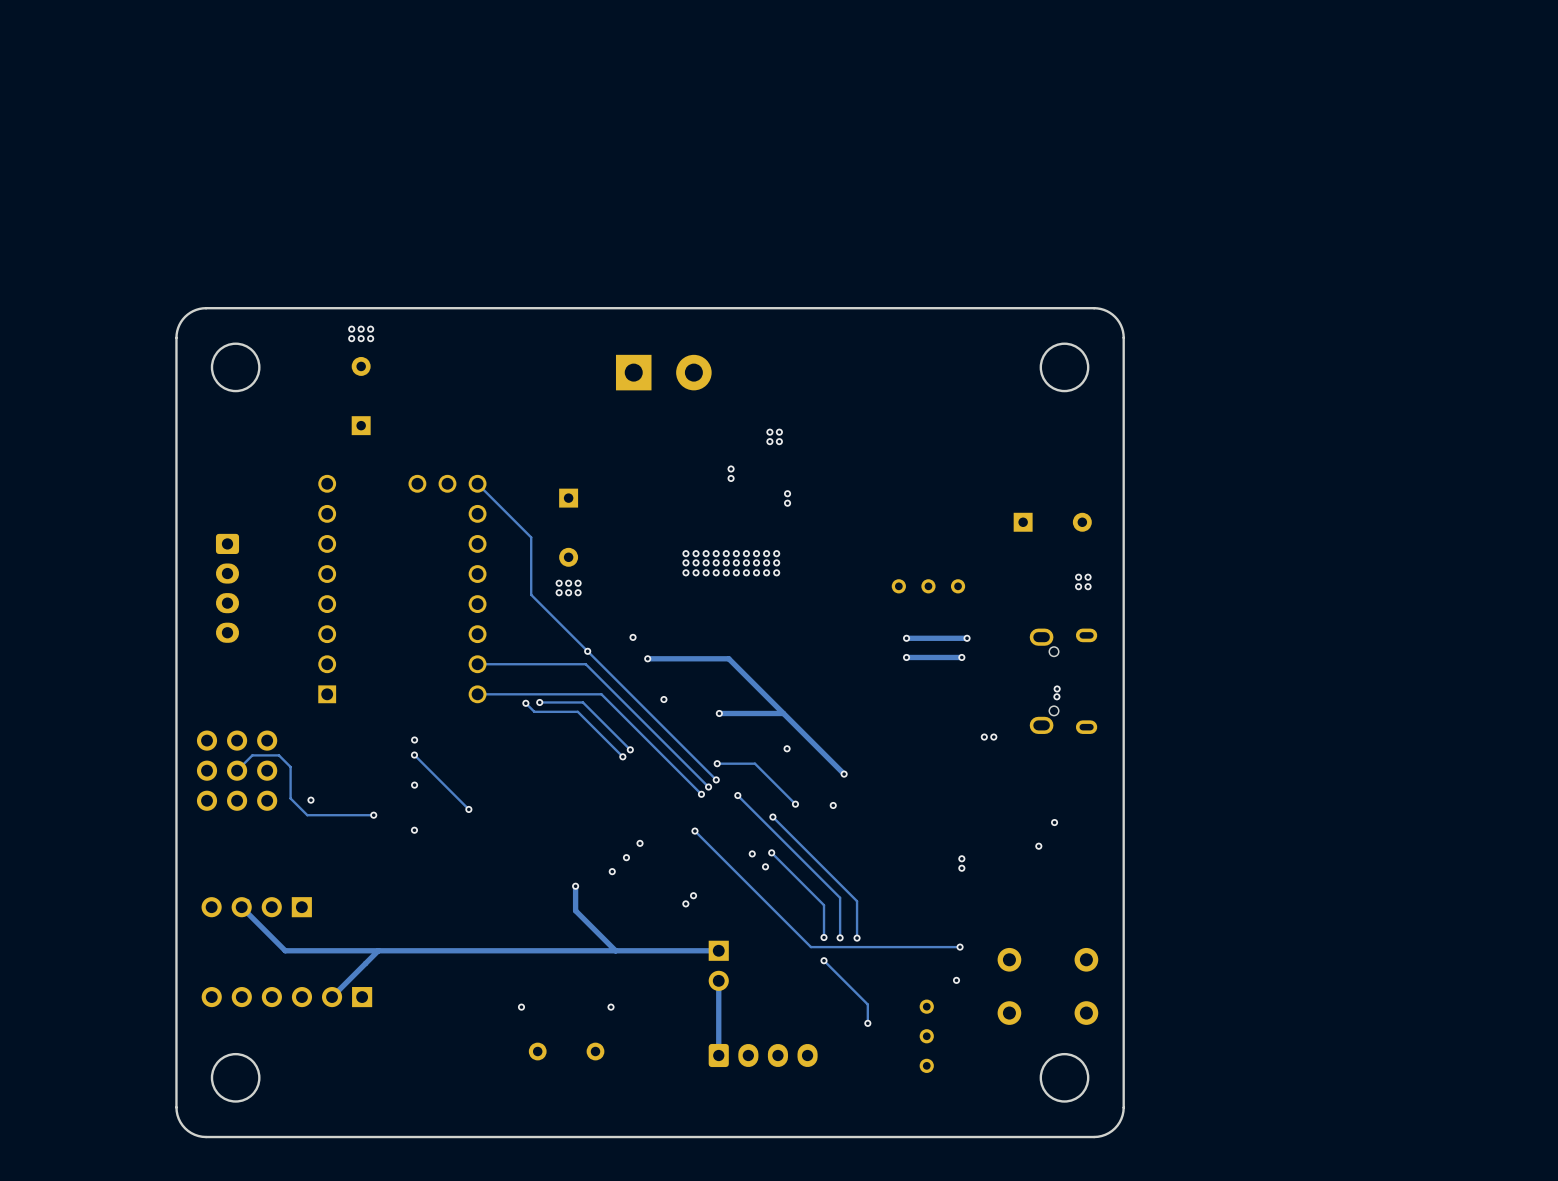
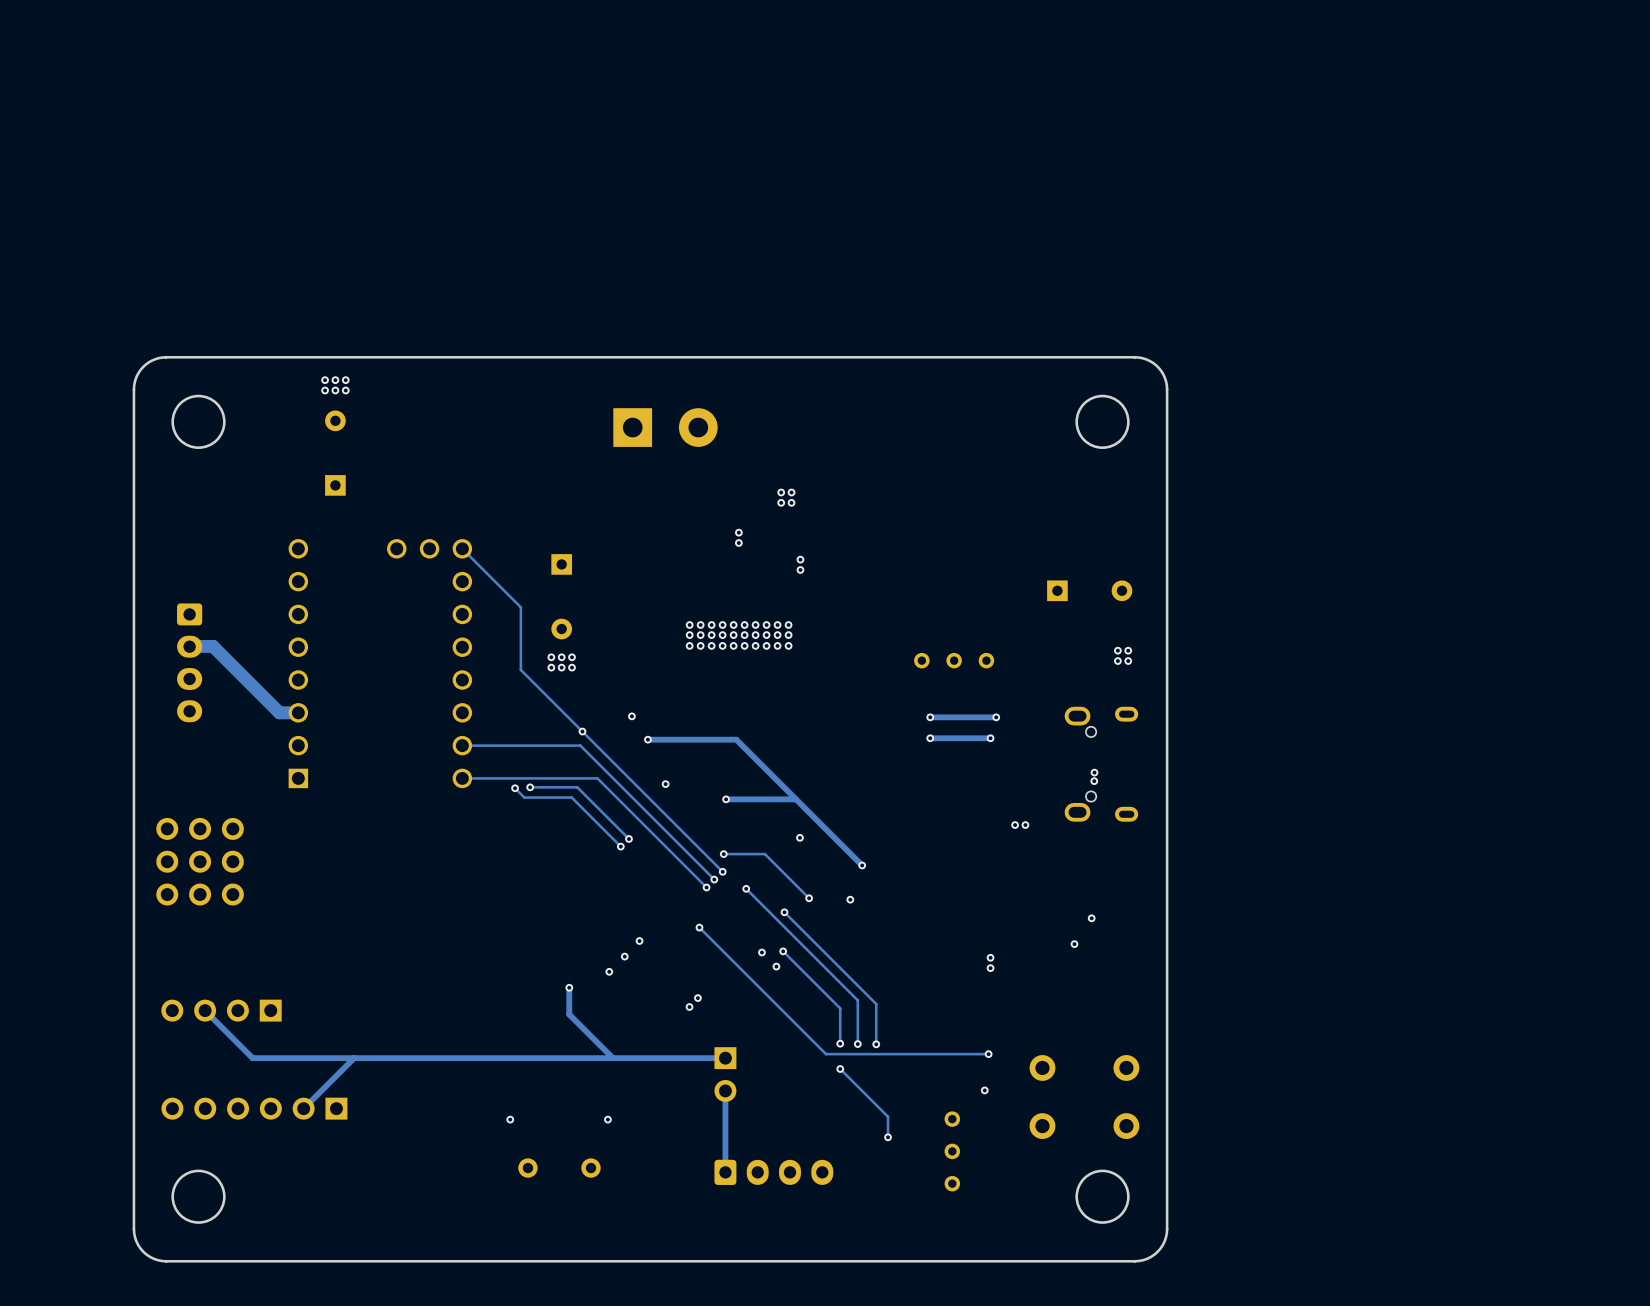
track: none -> (189, 646) (213, 646) (279, 712) (298, 712)
via: (414, 740) -> none
track: (414, 755) (468, 809) -> none
via: (414, 755) -> none
track: (237, 770) (252, 755) (279, 755) (290, 767) (290, 798) (307, 815) (373, 815) -> none
via: (414, 785) -> none
via: (310, 800) -> none
via: (468, 809) -> none
via: (373, 815) -> none
via: (414, 830) -> none

